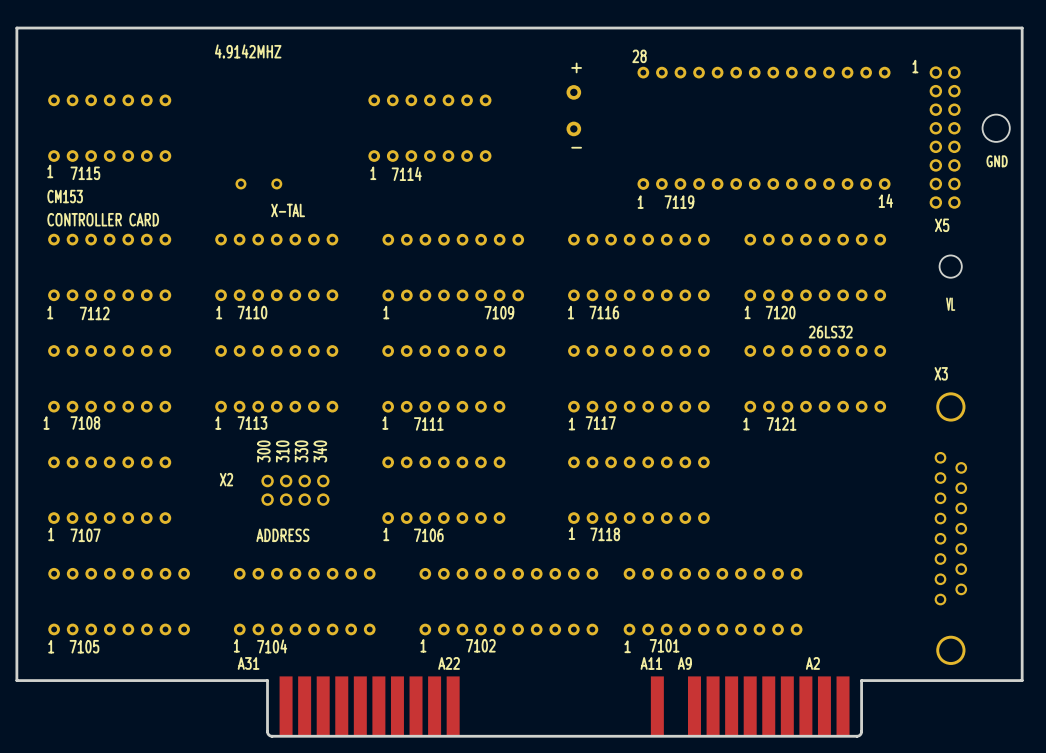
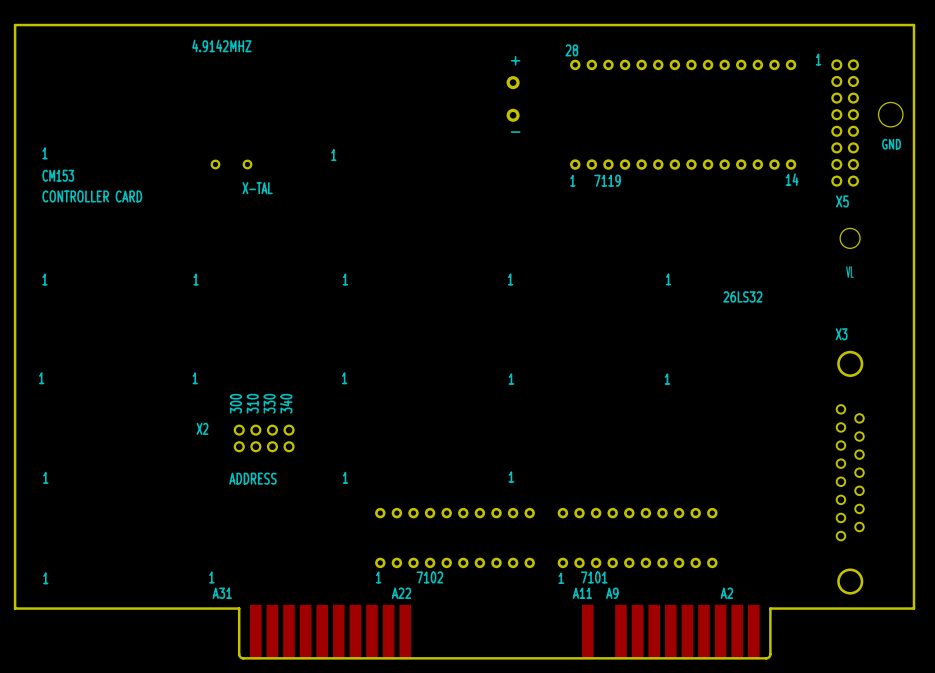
7115: (109, 128) -> none
7114: (429, 128) -> none
7112: (109, 267) -> none
7110: (276, 267) -> none
7109: (453, 267) -> none
7116: (638, 267) -> none
7120: (815, 267) -> none
7108: (109, 378) -> none
7113: (276, 378) -> none
7111: (443, 378) -> none
7117: (638, 378) -> none
7121: (815, 378) -> none
7107: (109, 490) -> none
7106: (443, 490) -> none
7118: (638, 490) -> none
7105: (119, 601) -> none
7104: (304, 601) -> none

